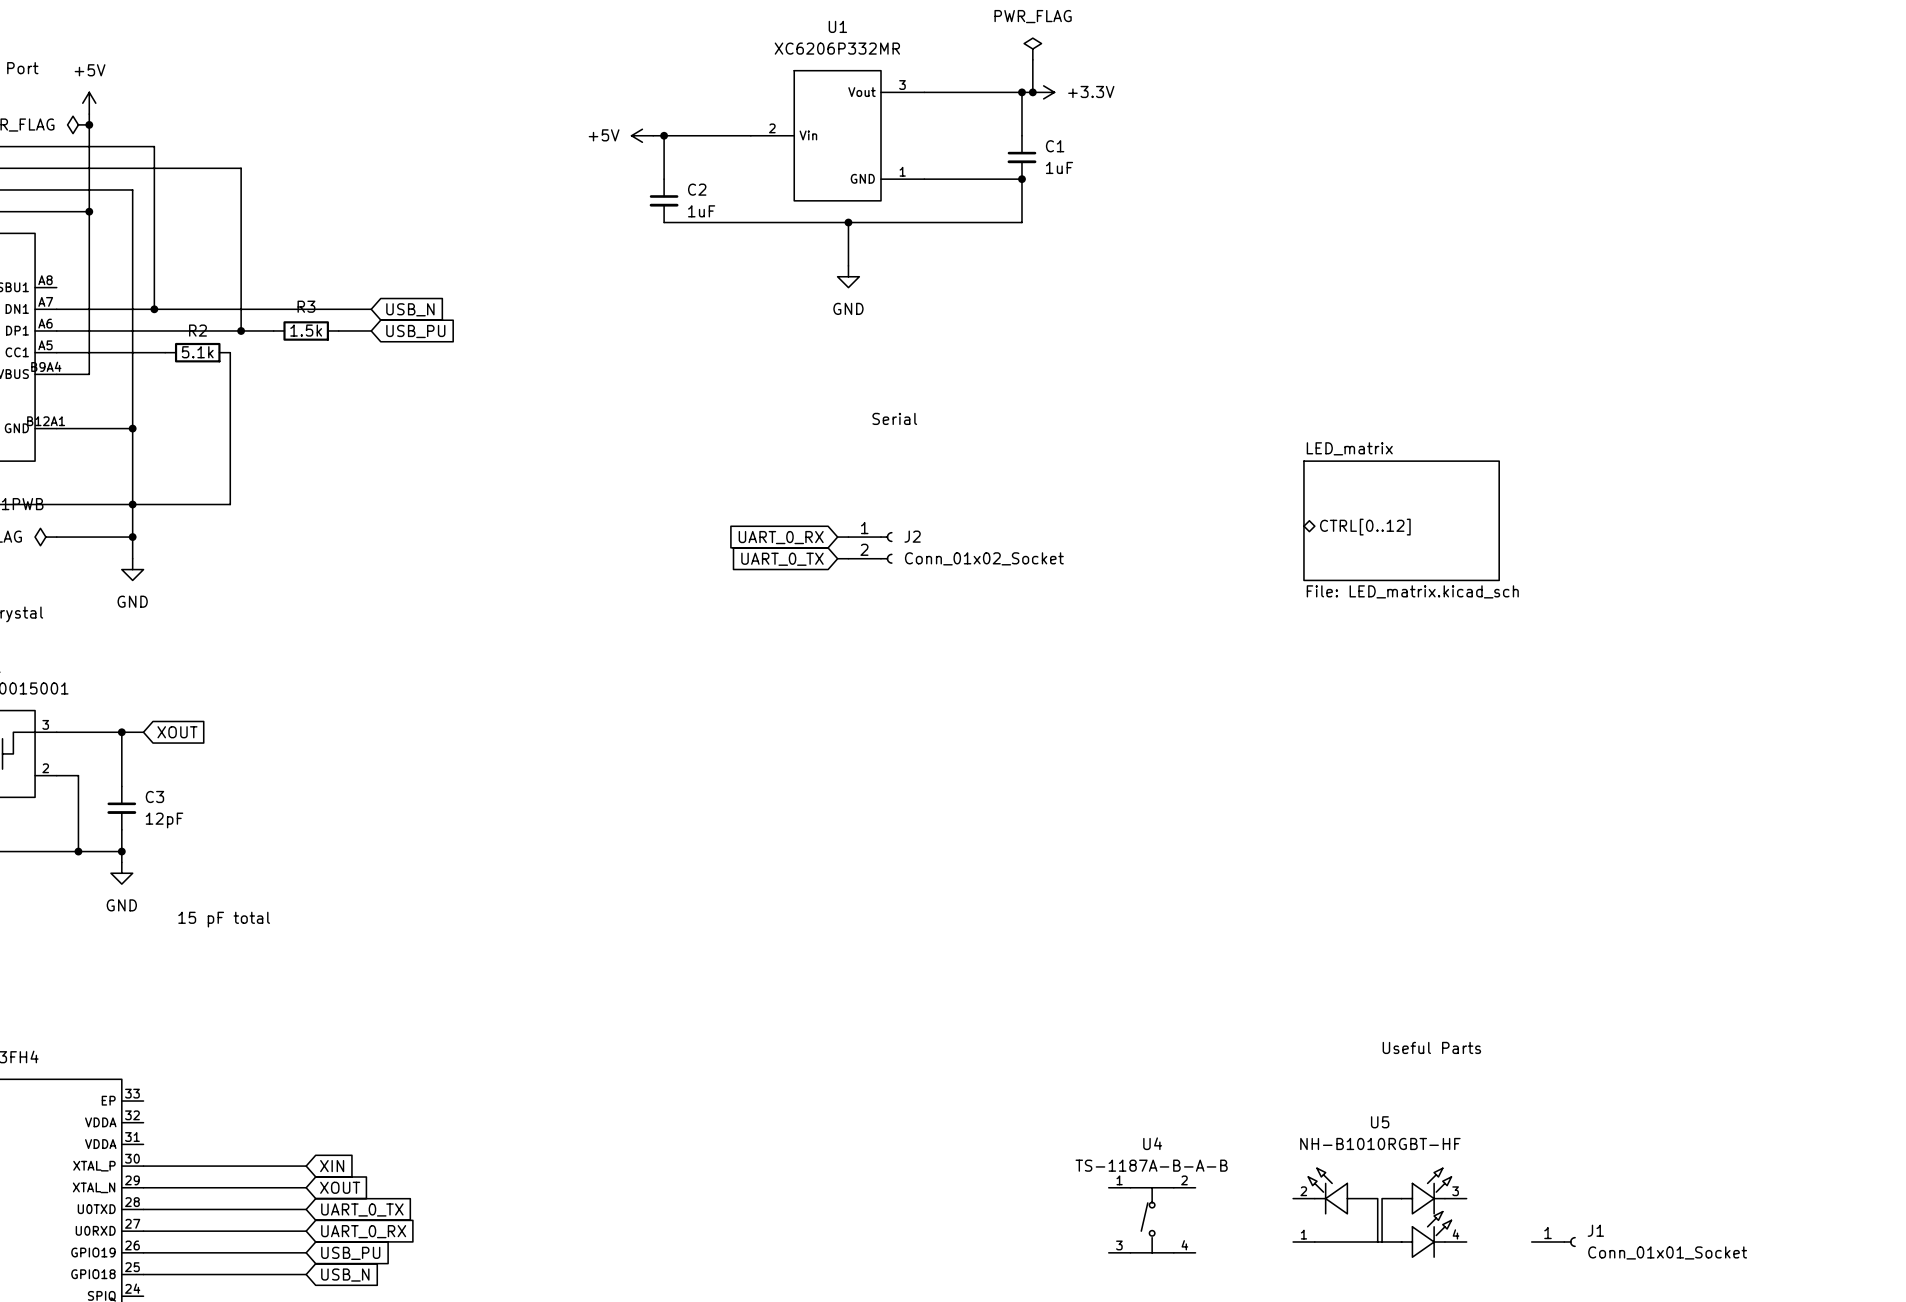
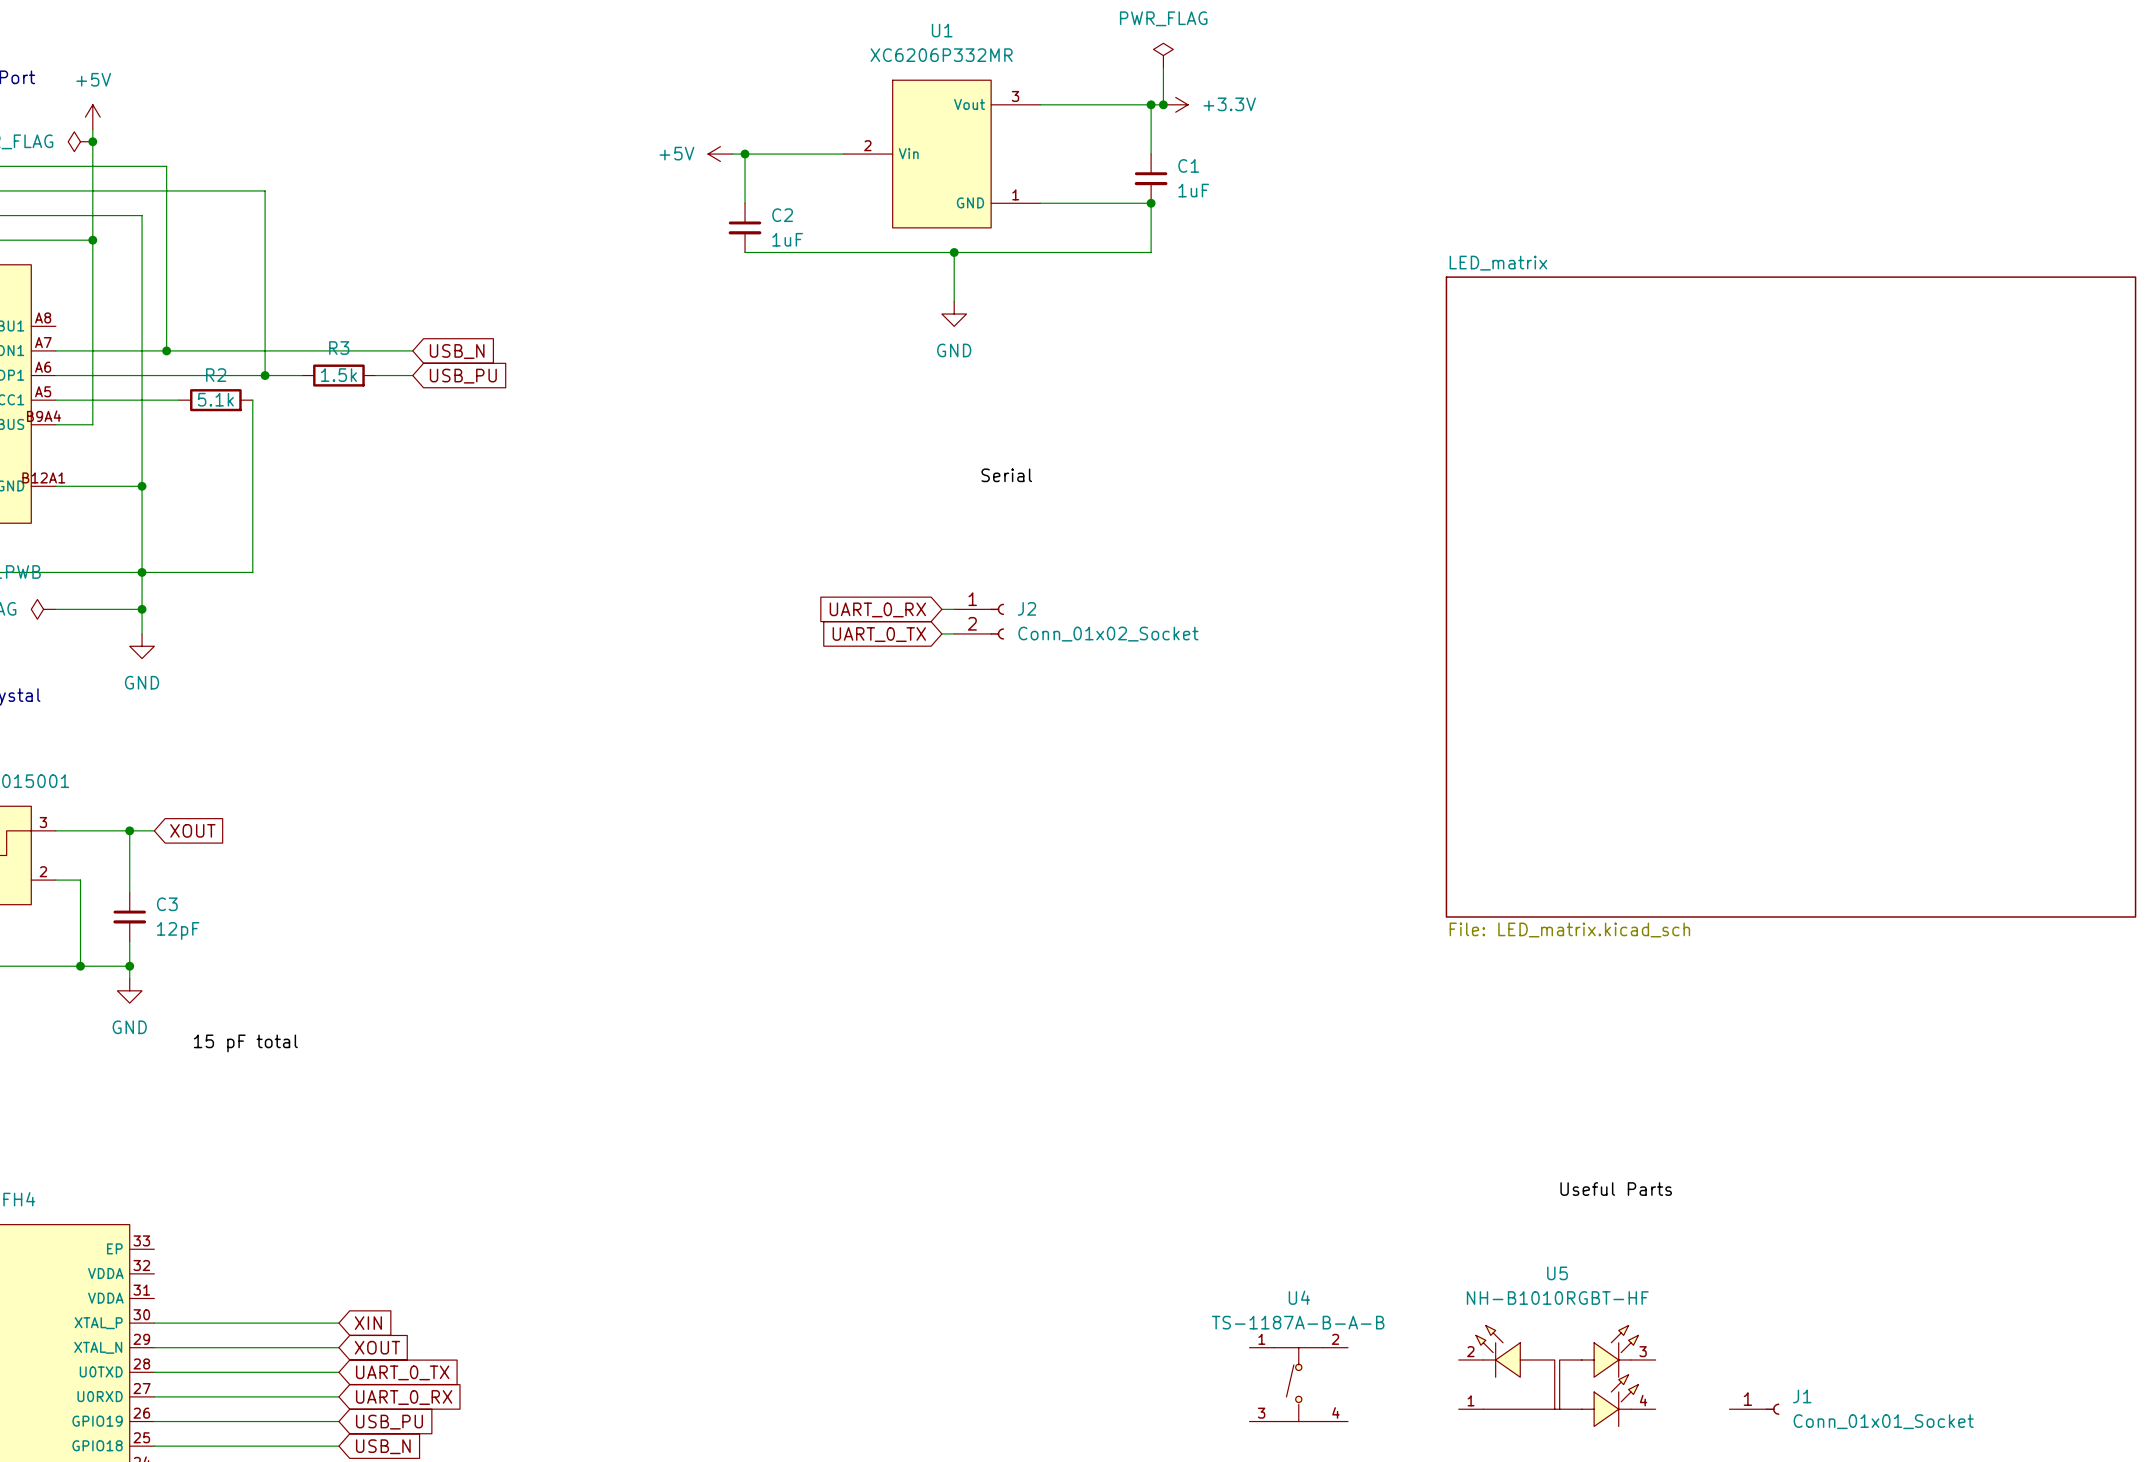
sheet LED_matrix: File: LED_matrix.kicad_sch (1401, 520) -> none
sheet LED_matrix: none -> File: LED_matrix.kicad_sch (1791, 597)
sheet pin: CTRL[0..12] (1365, 527) -> none

